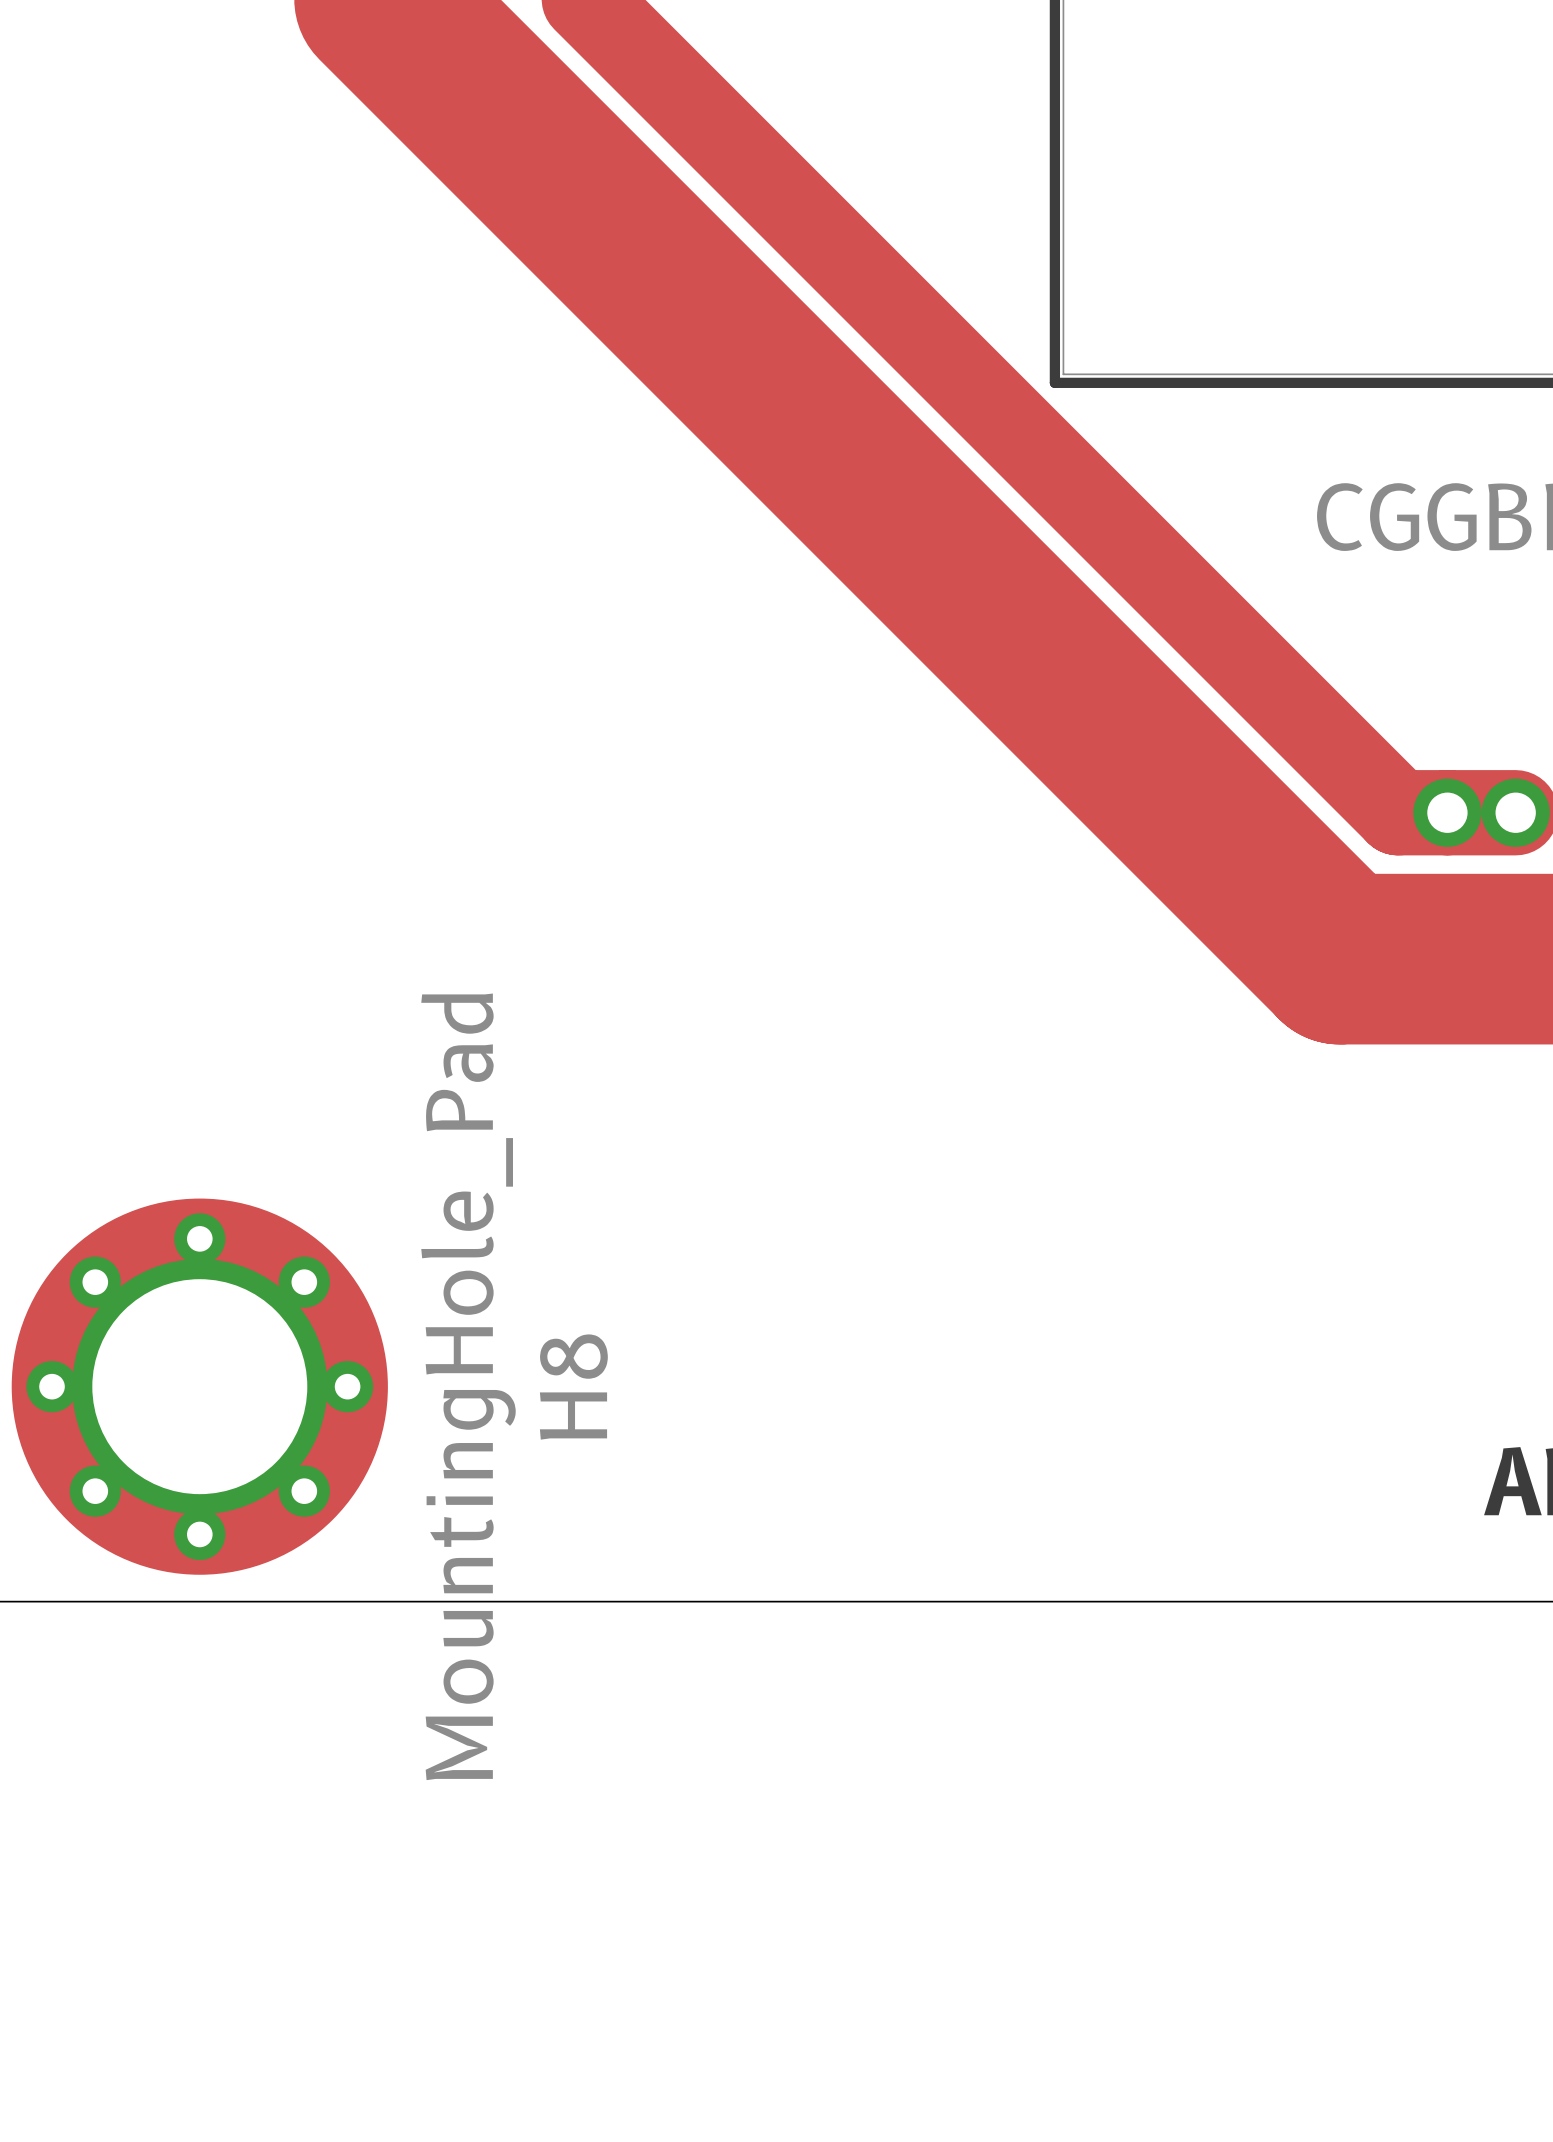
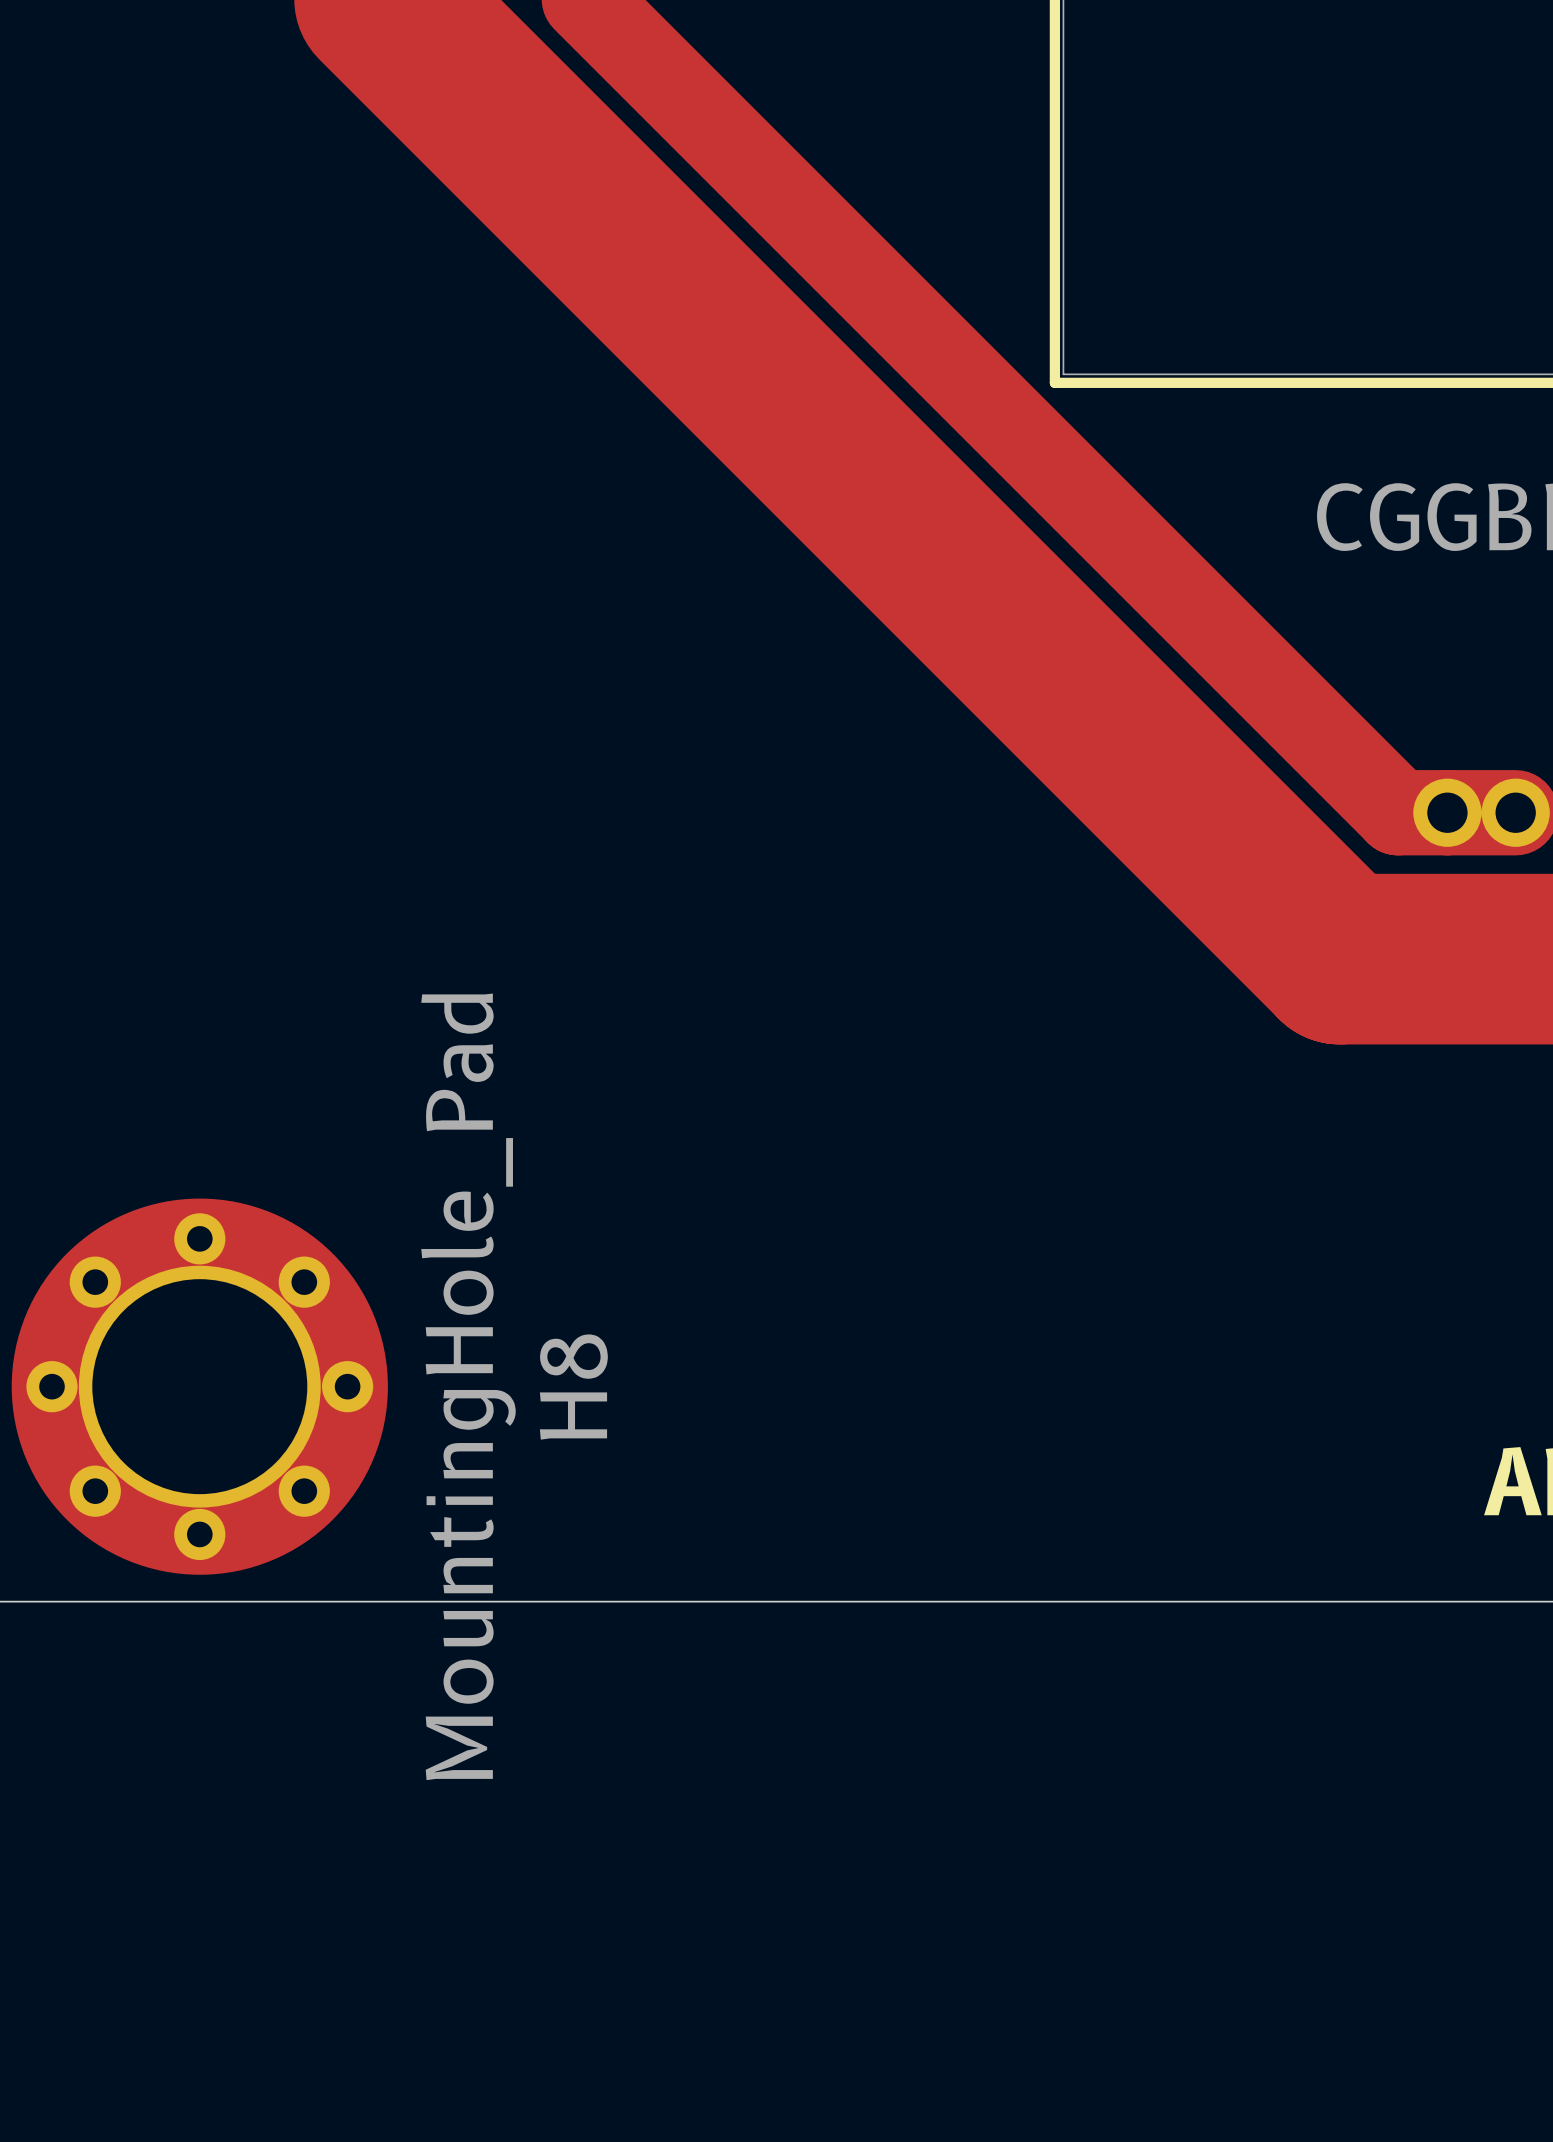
H8 footprint: [11, 1198, 388, 1575] -> [11, 1198, 388, 1575]

